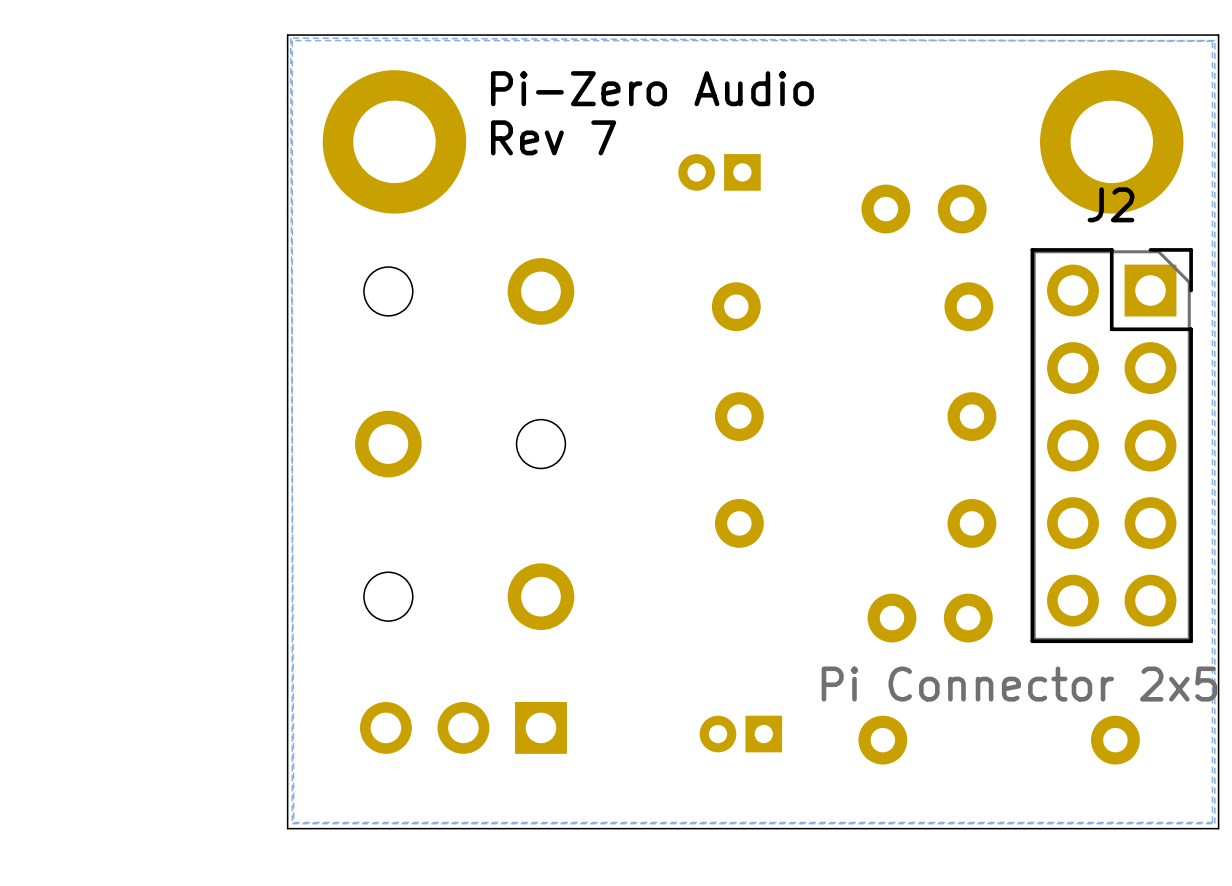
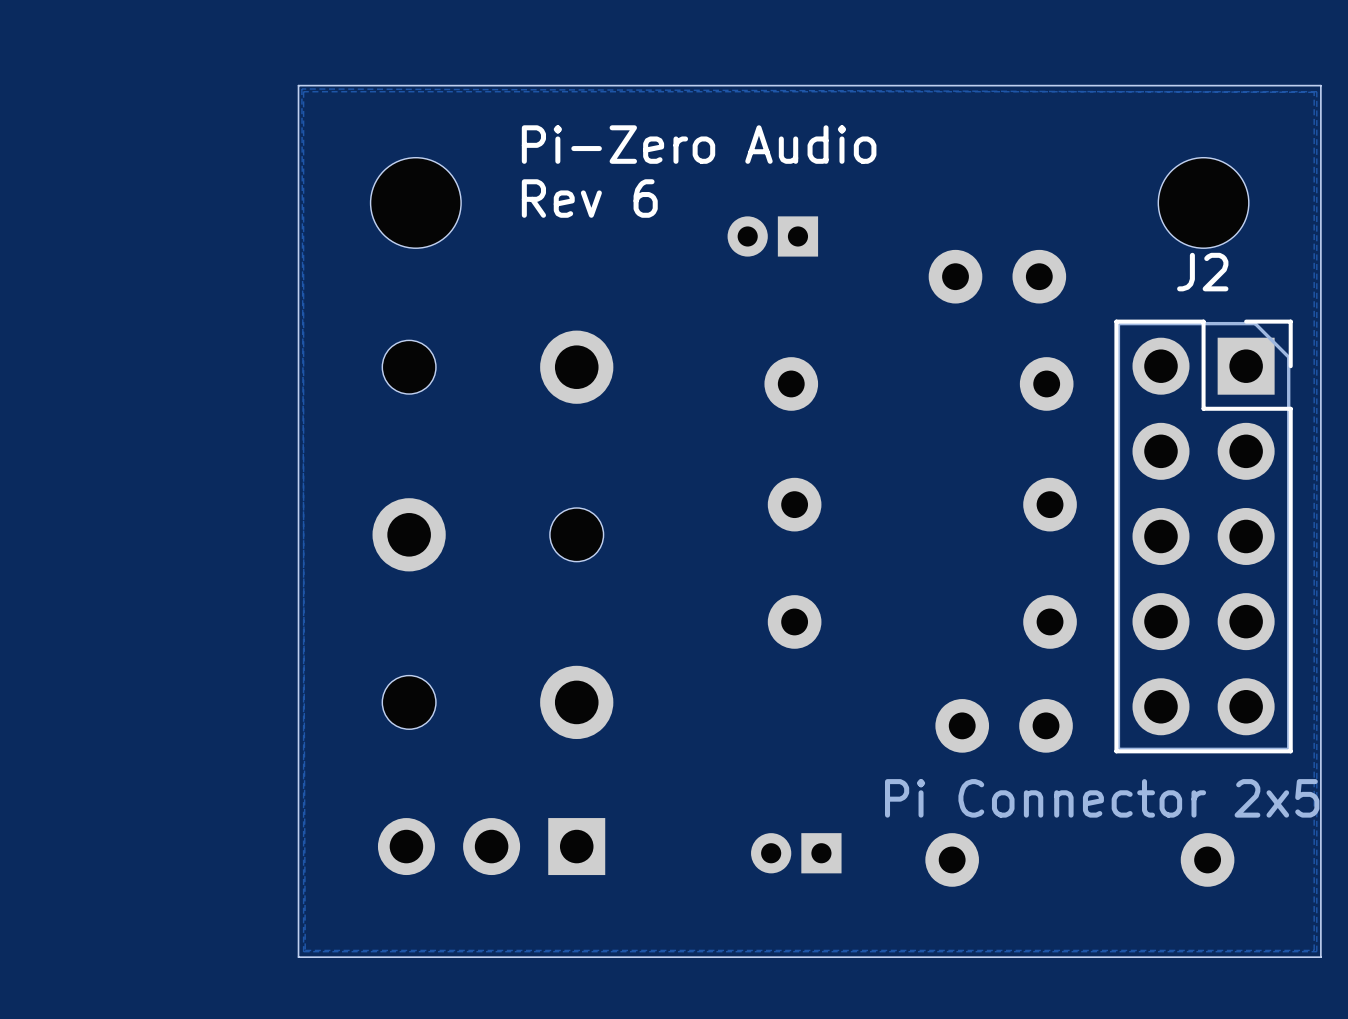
part footprint: [322, 70, 467, 214] -> [370, 157, 462, 249]
part footprint: [1040, 70, 1184, 214] -> [1158, 157, 1249, 249]
text: Rev 7 (553, 137) -> Rev 6 (589, 198)

